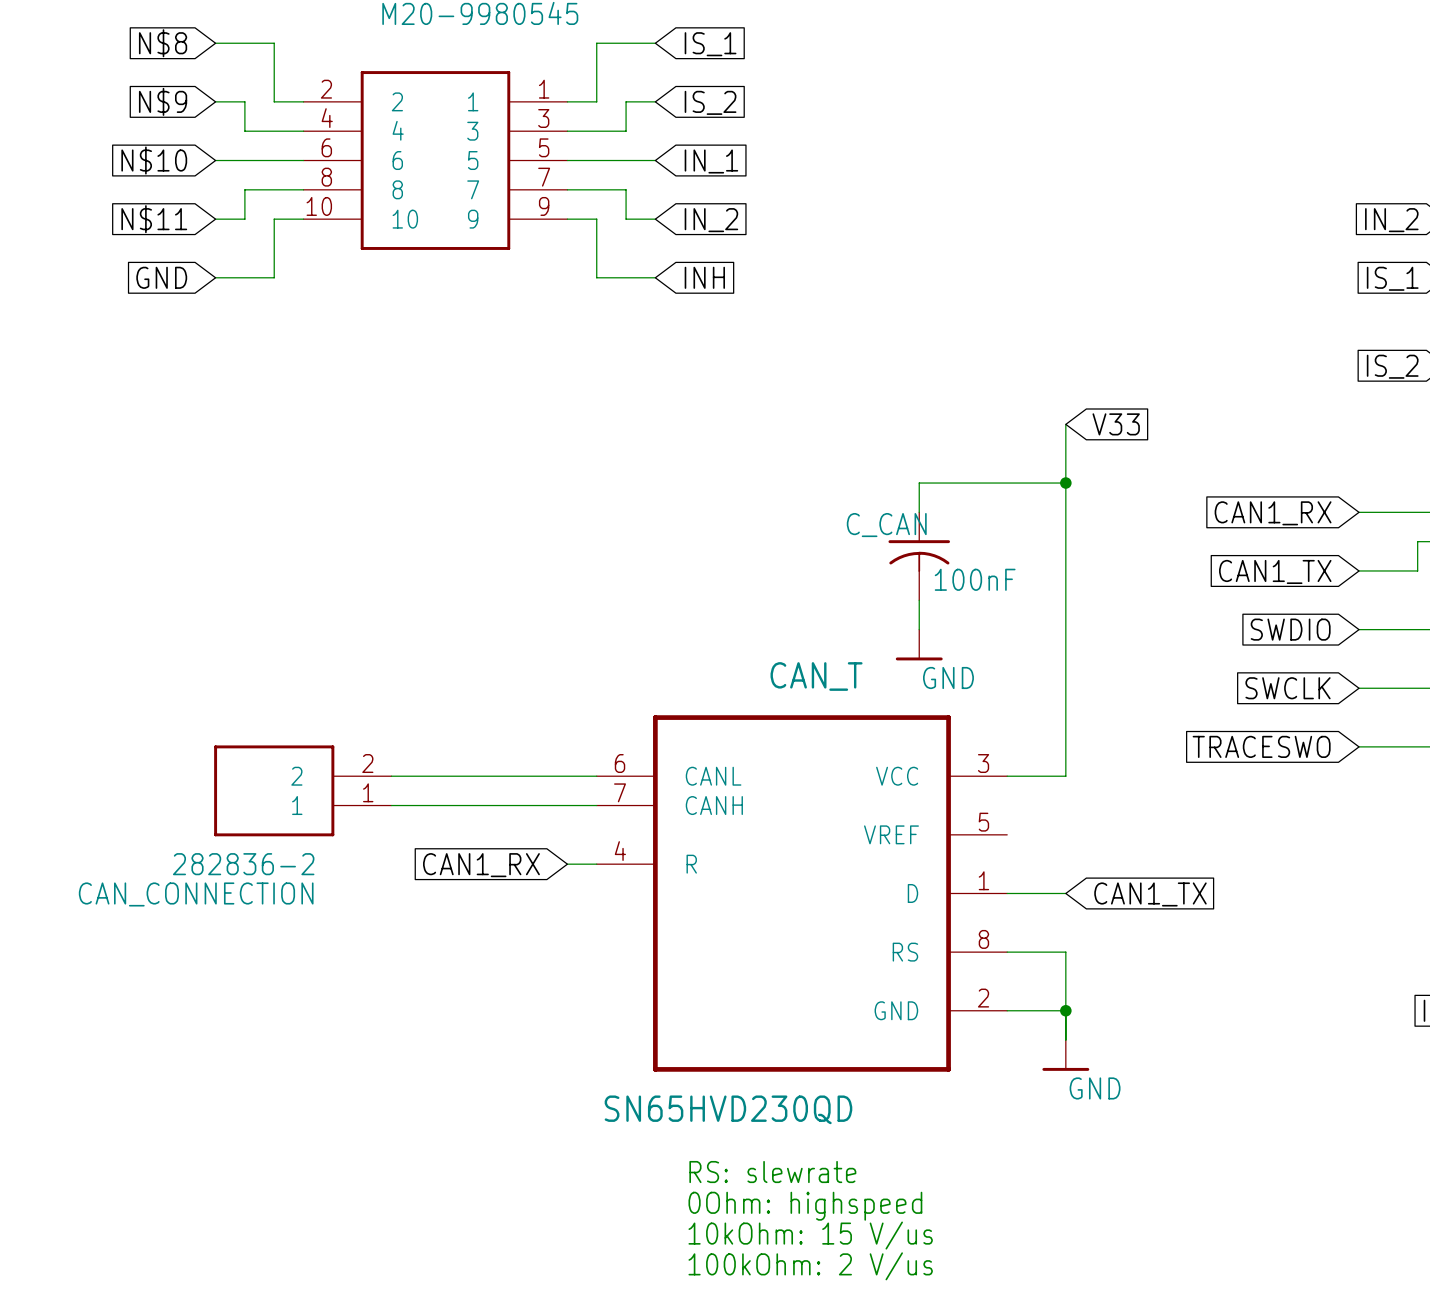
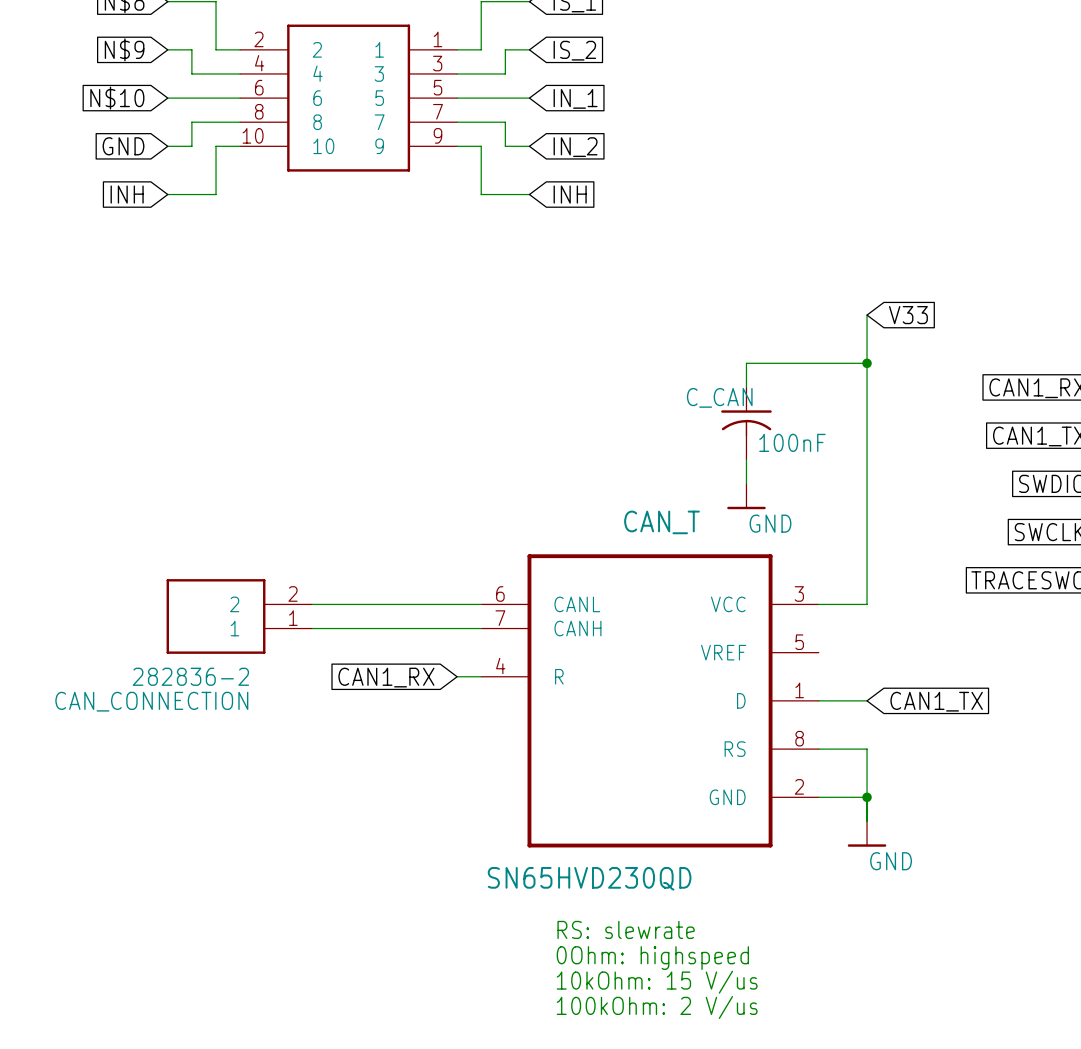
global label: N$11 (154, 219) -> GND (123, 146)
global label: GND (161, 277) -> INH (127, 194)

